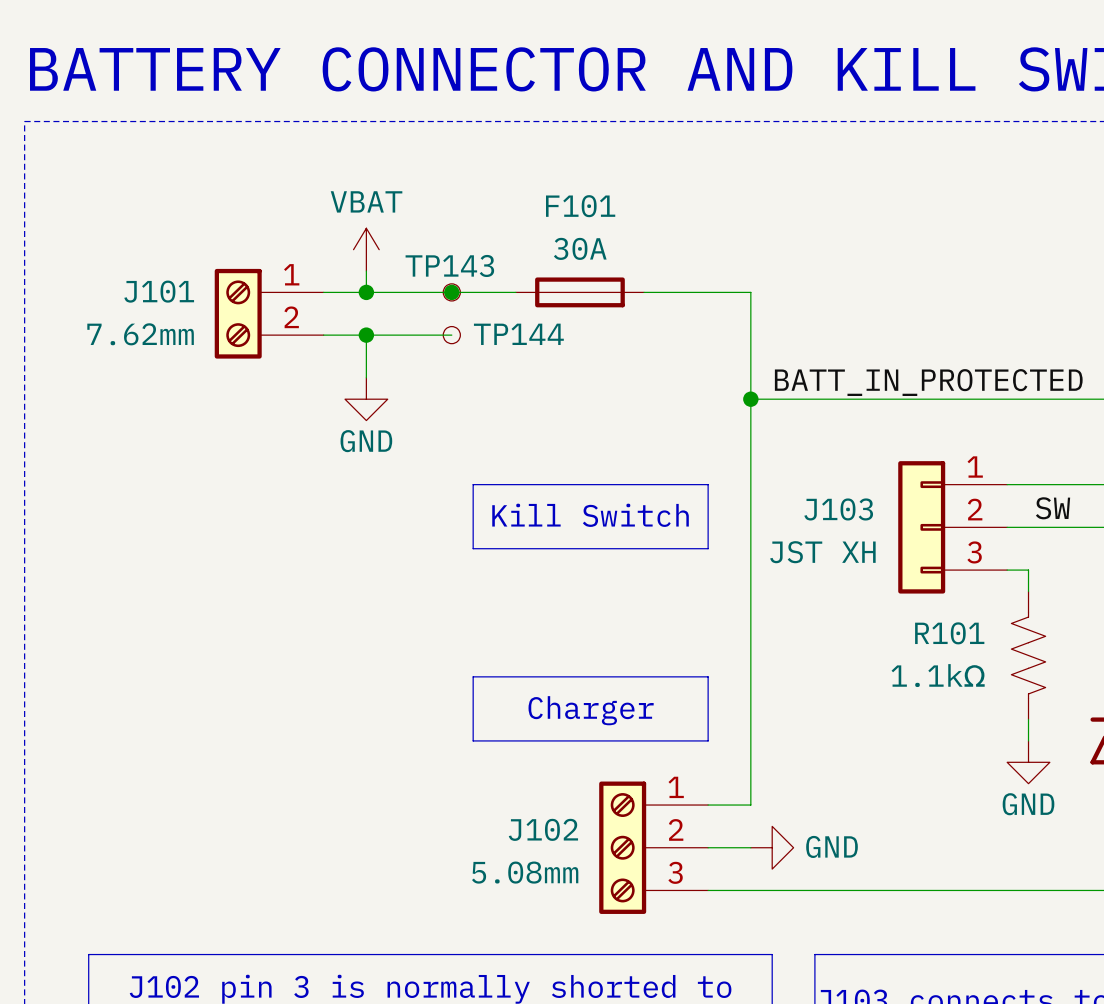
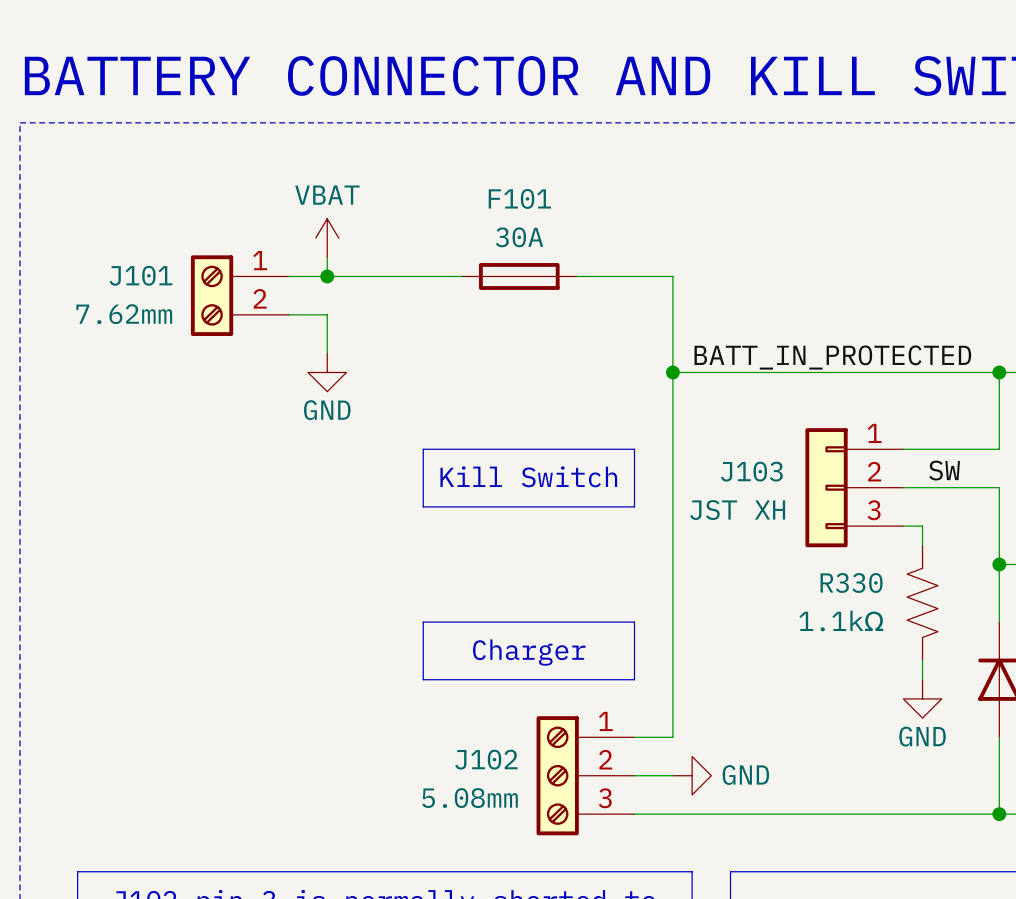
junction: (451, 292) -> none
TP143: (451, 292) -> none
wire: (366, 335) (451, 335) -> none
junction: (366, 335) -> none
TP144: (451, 335) -> none
R101 name: R101 (949, 633) -> R330 (851, 582)

